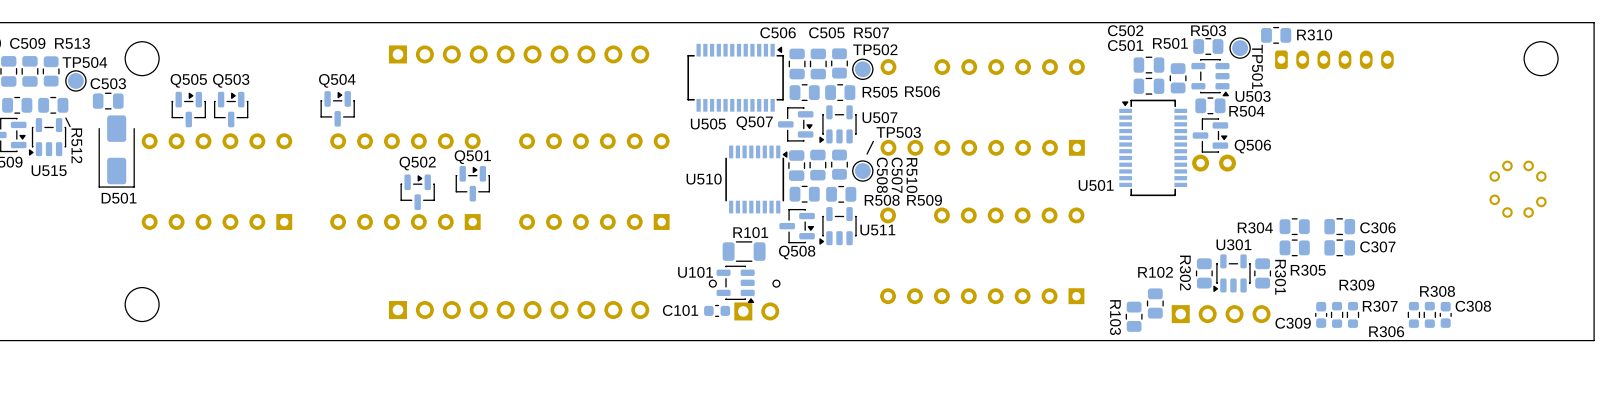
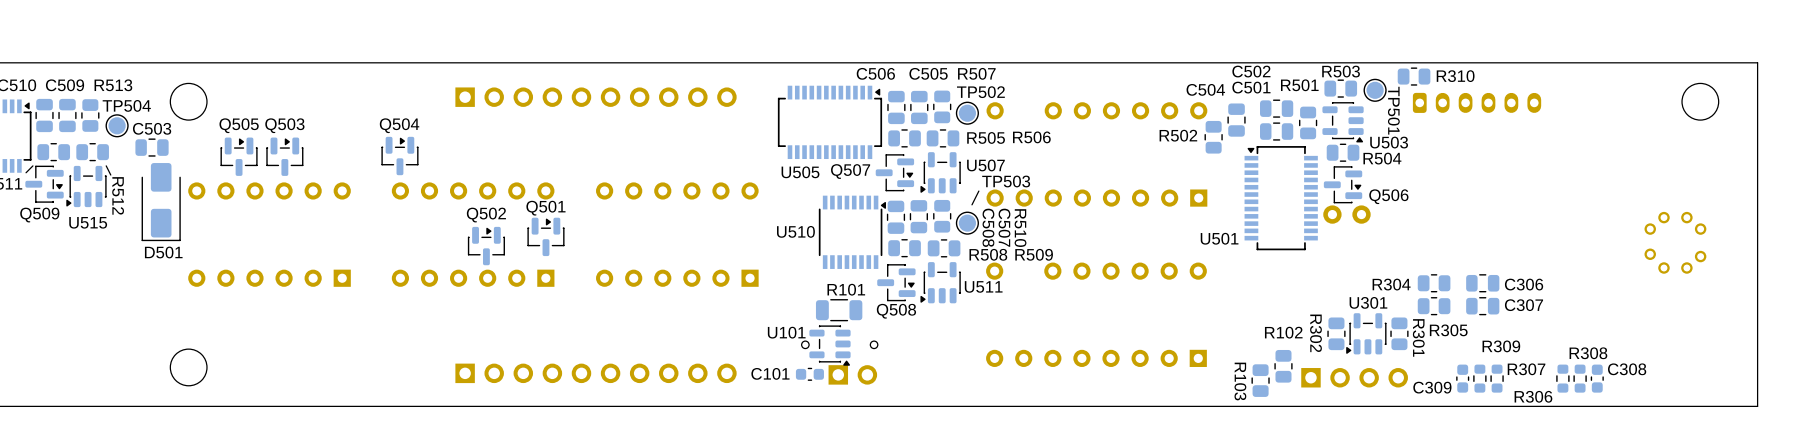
C504: none -> (1236, 120)
R502: none -> (1213, 137)

